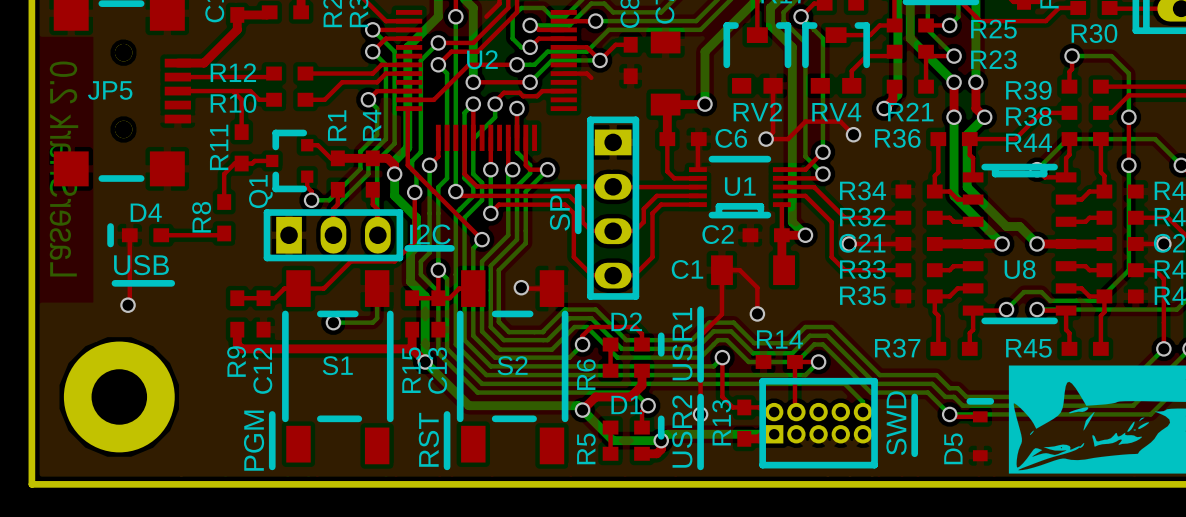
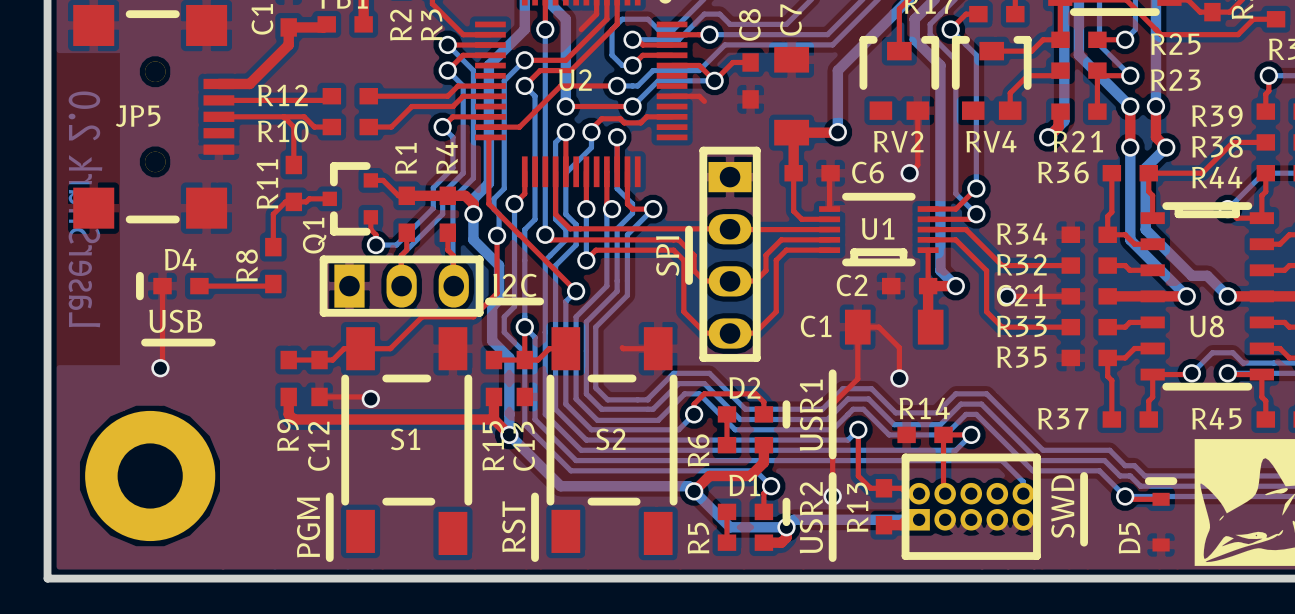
top track: (853, 134) (840, 121) (805, 121) (787, 139) (766, 139) -> none
via: (853, 134) -> none
via: (521, 287) -> none
bottom track: (377, 292) (377, 318) (372, 322) (333, 322) -> none
via position: (333, 322) -> (370, 398)
top track: none -> (319, 396) (368, 396) (370, 398)

